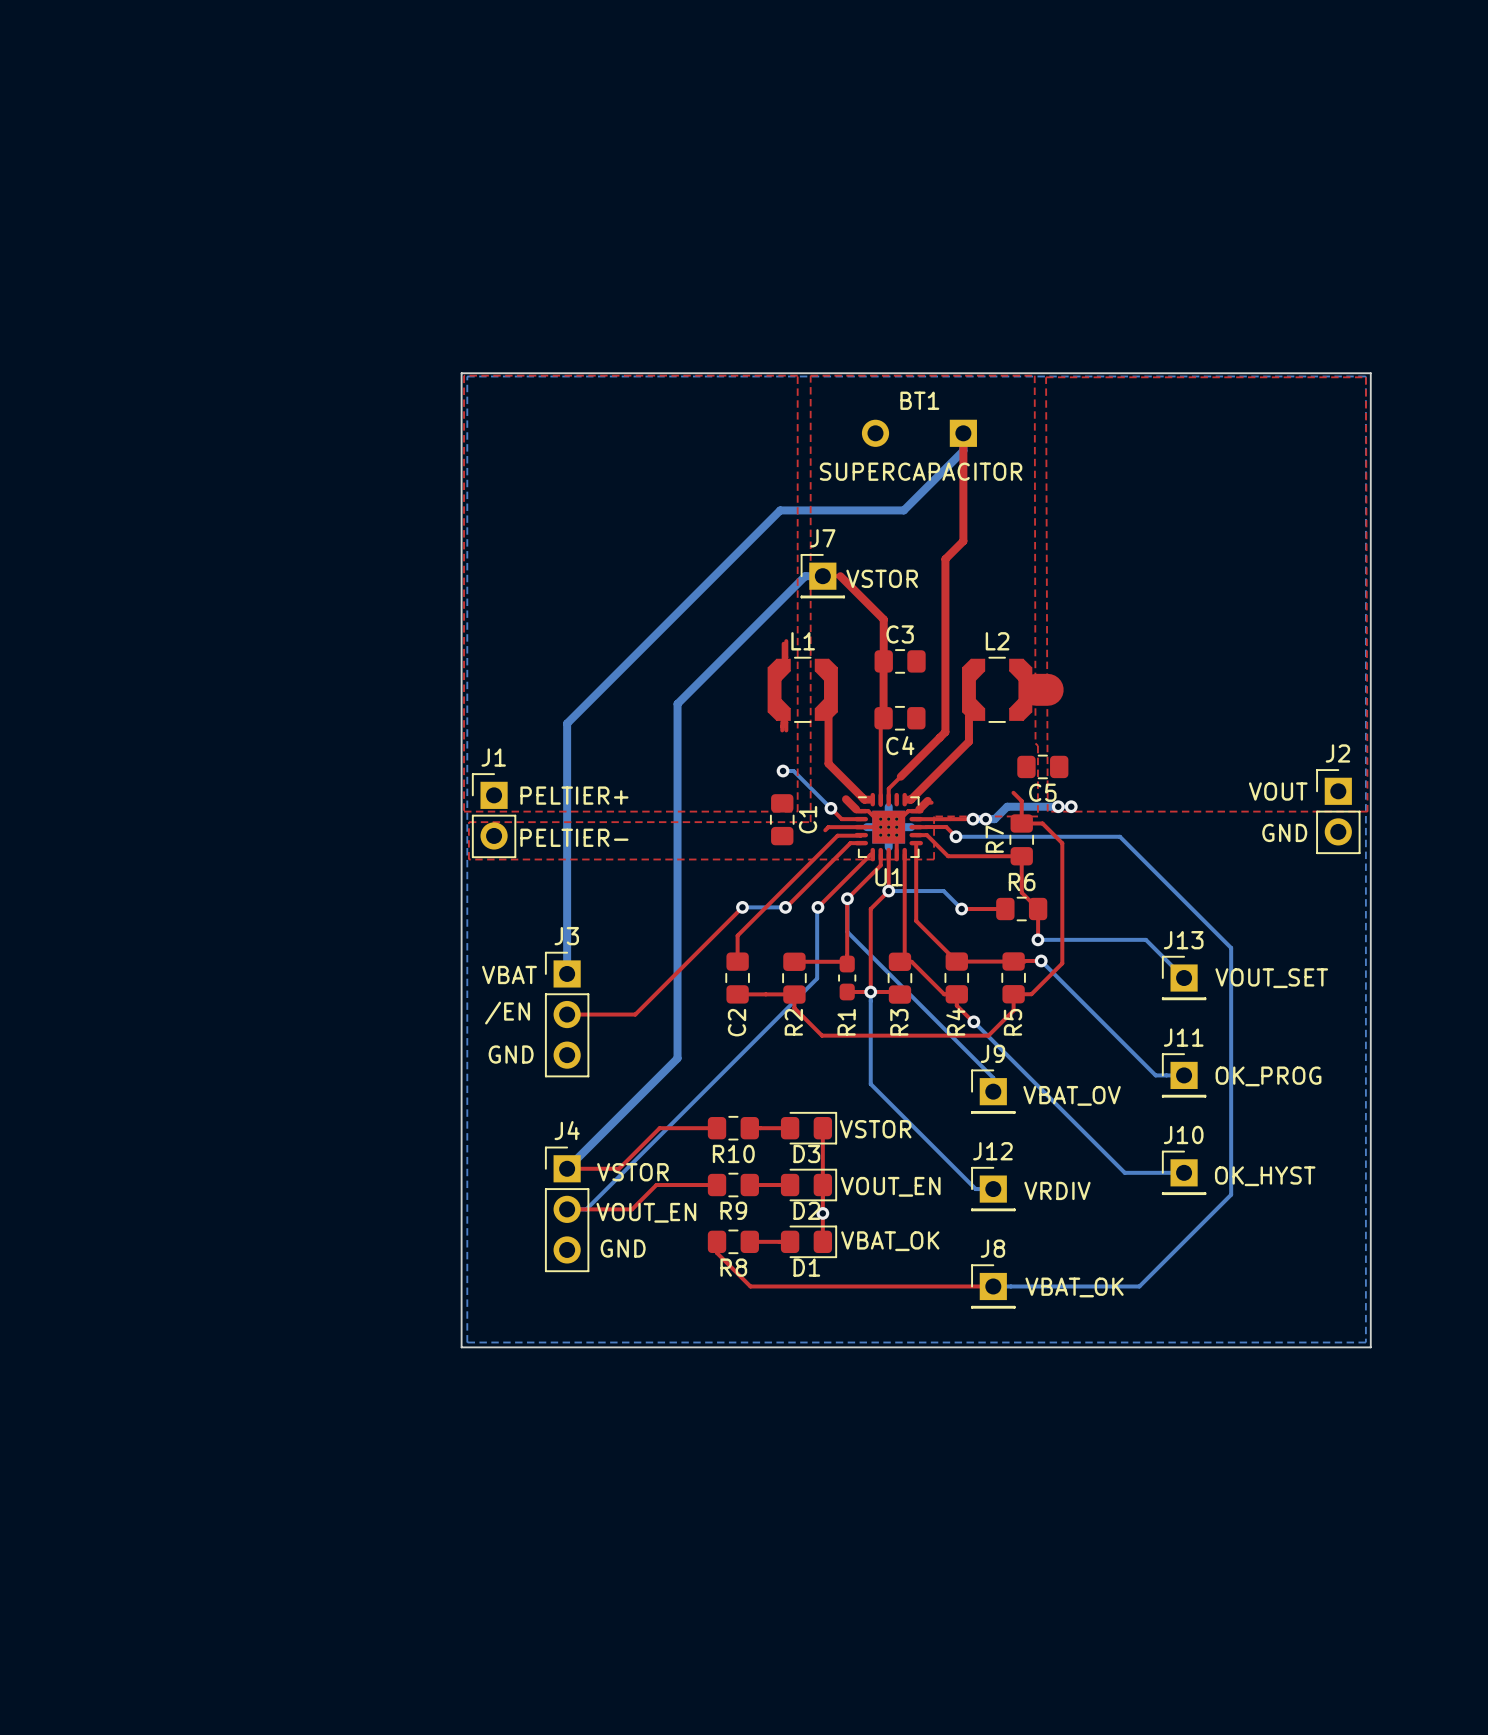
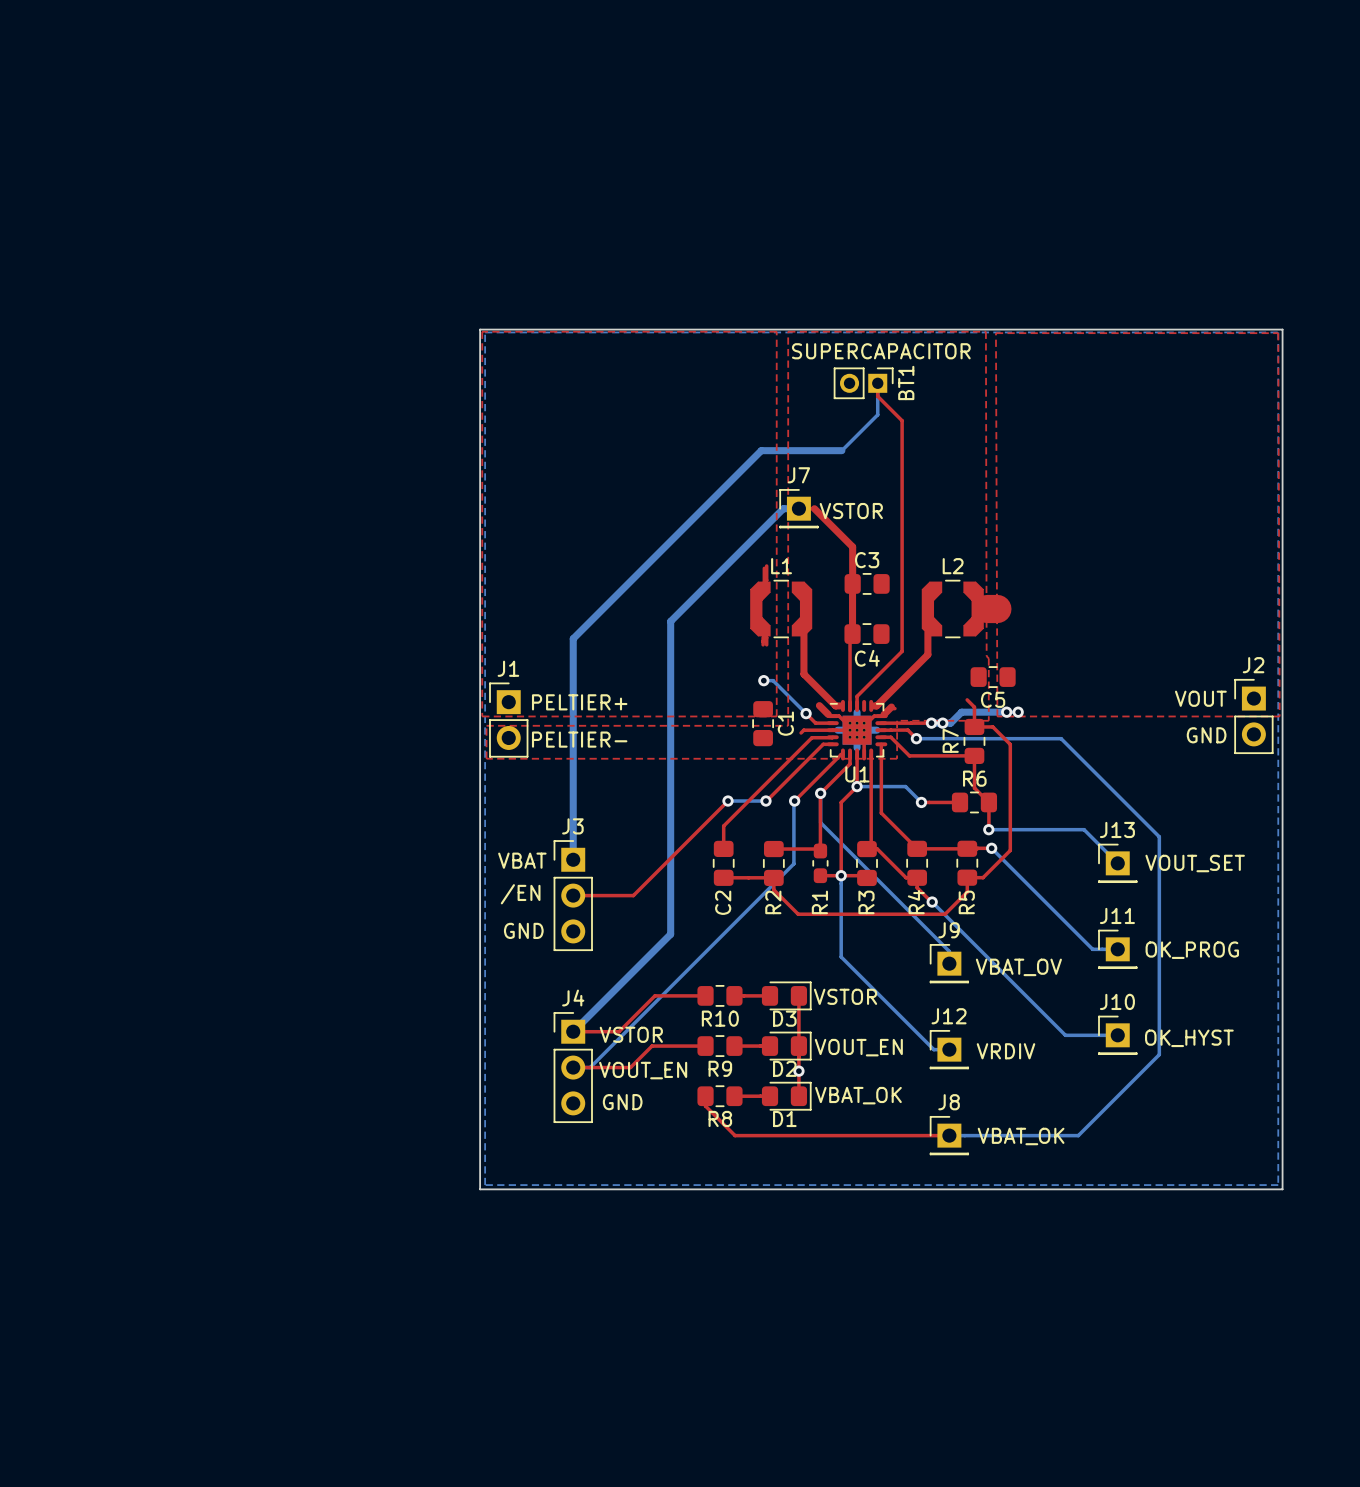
BT1 name position: BT1 (919, 400) -> BT1 (906, 382)
BT1 footprint: [861, 419, 977, 447] -> [833, 367, 894, 400]
top track: (963, 433) (963, 541) (945, 559) (945, 732) (888, 788) -> (902, 651) (857, 696)
bottom track: (963, 433) (963, 450) (903, 510) (871, 510) -> (877, 383) (877, 414) (841, 450)
top track: none -> (877, 383) (877, 396) (902, 420) (902, 651)
text position: SUPERCAPACITOR (921, 471) -> SUPERCAPACITOR (881, 351)

